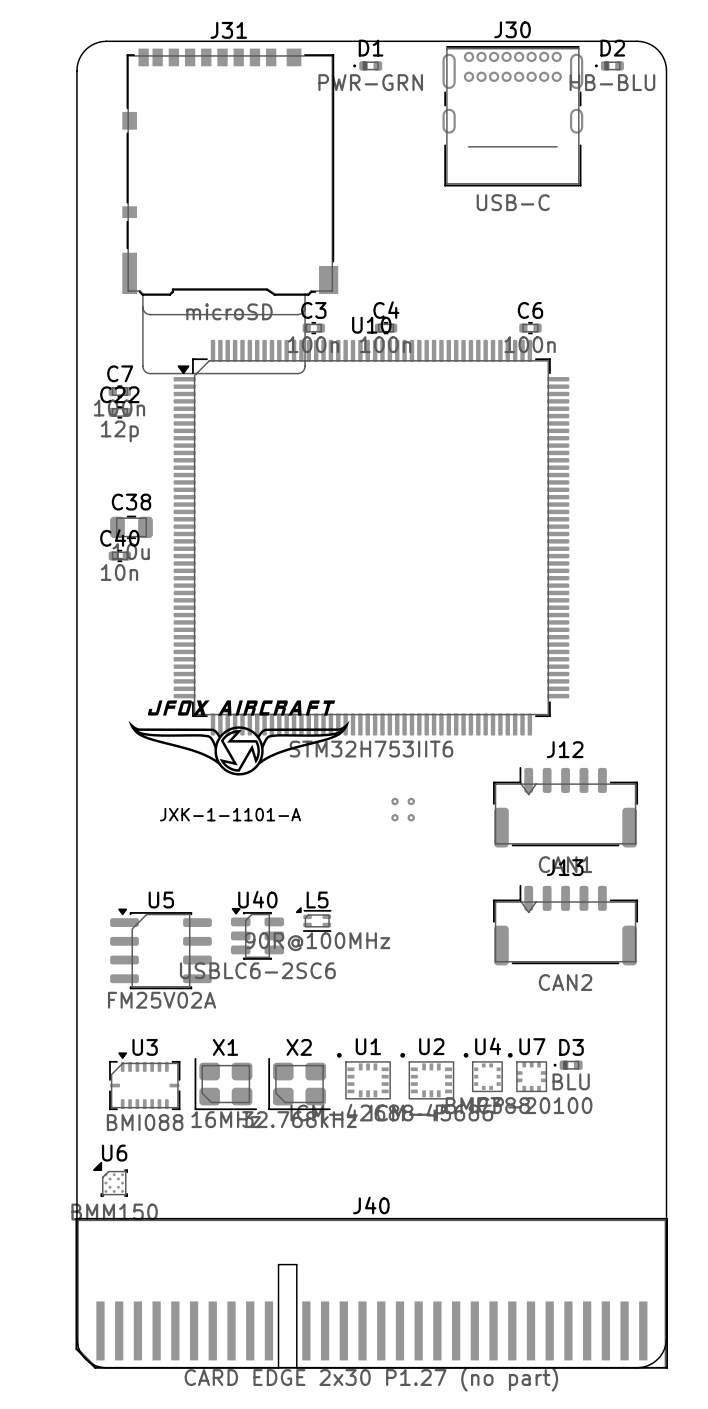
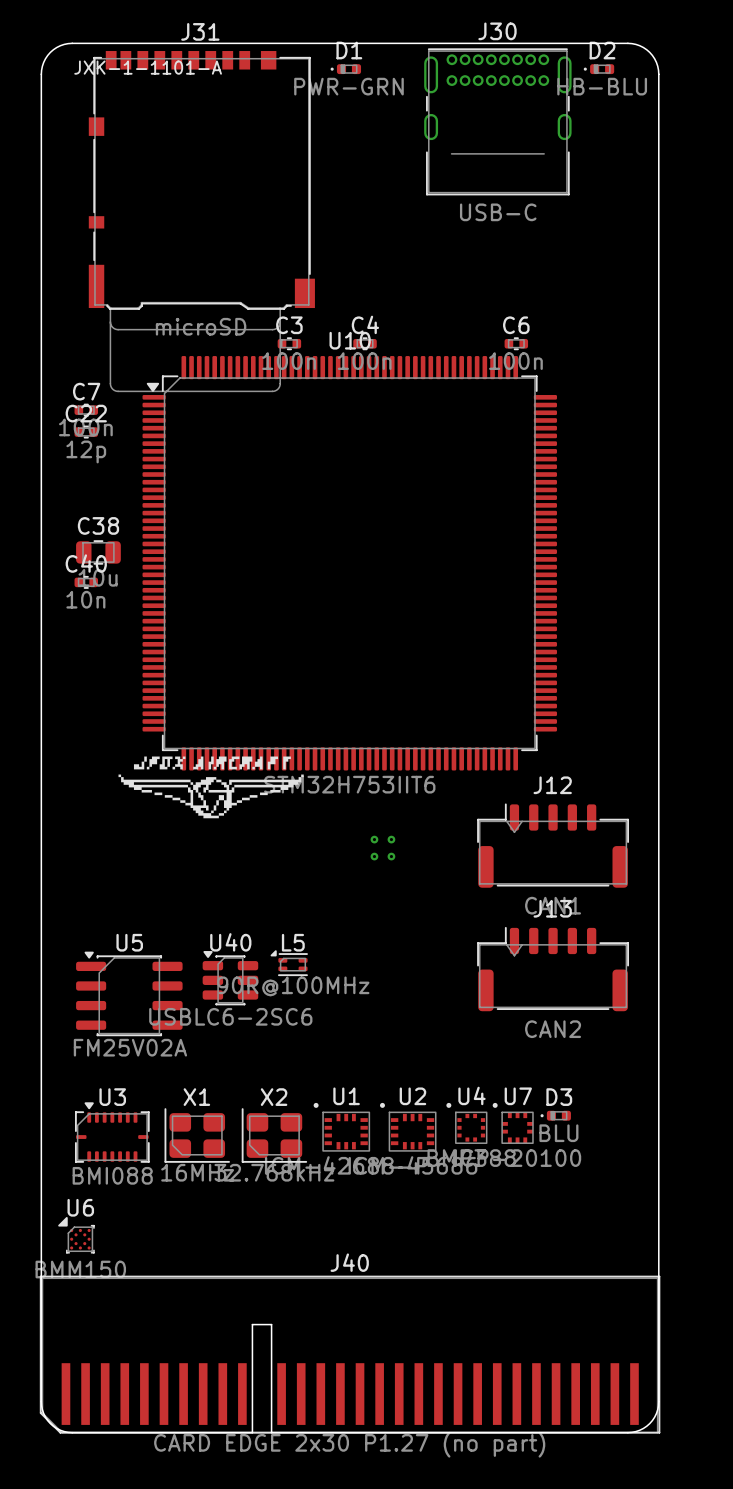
text: none -> JXK-1-1101-A (148, 67)
drawing shape: [128, 700, 350, 776] -> [118, 756, 304, 819]
text: JXK-1-1101-A (230, 814) -> none

